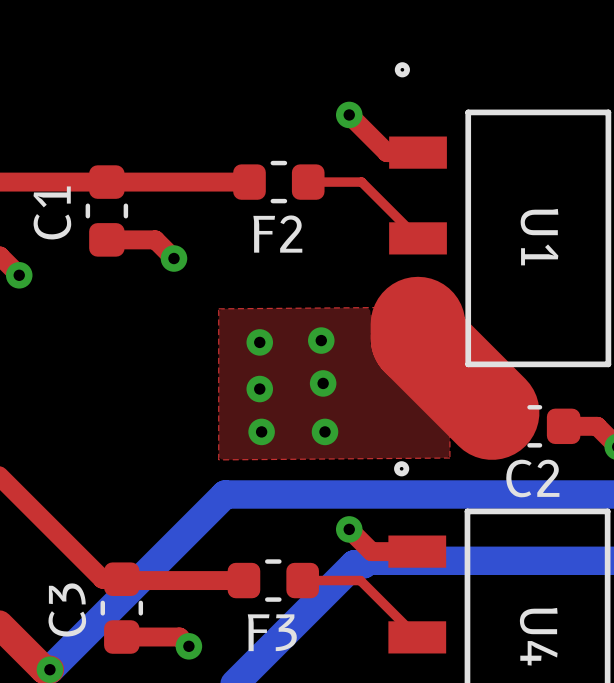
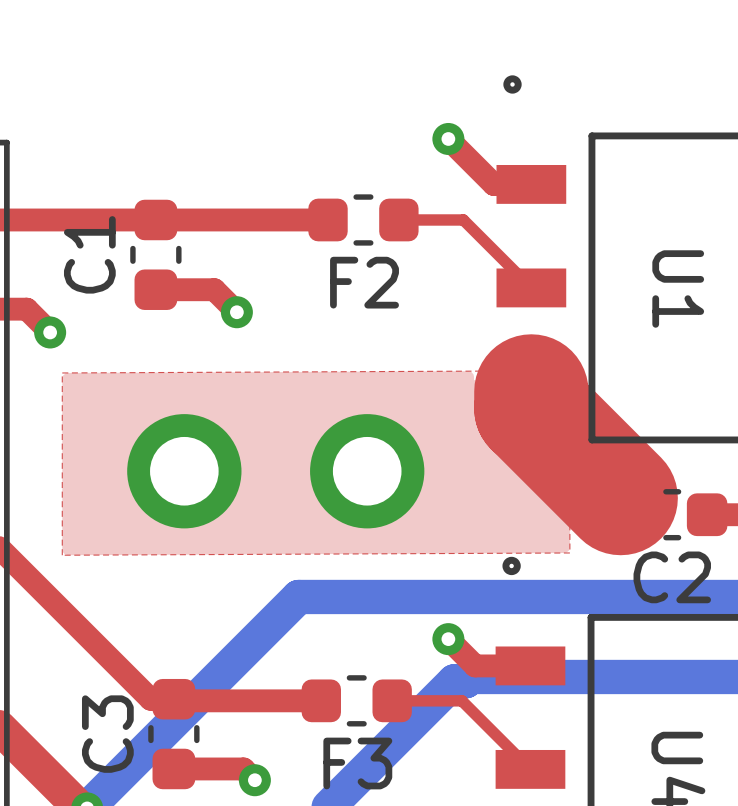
top zone outline: (449, 306) (218, 308) (218, 459) (449, 458) -> (569, 370) (62, 372) (62, 555) (569, 552)
via: (321, 340) -> none
via: (259, 342) -> none
via: (323, 383) -> none
via: (259, 389) -> none
via: none -> (184, 471)
via: none -> (367, 471)
via: (261, 431) -> none
via: (325, 431) -> none

